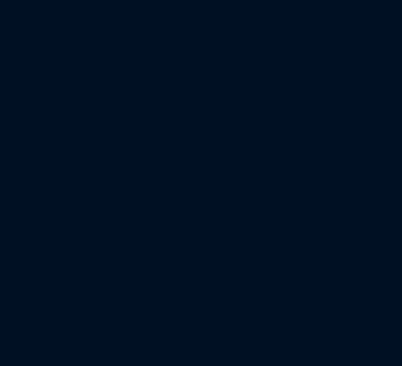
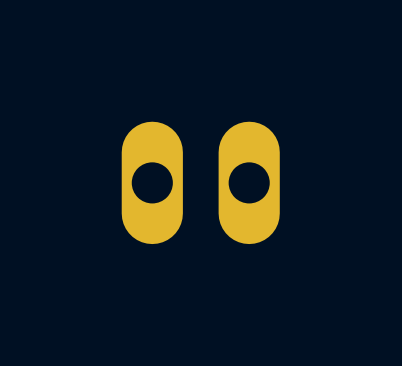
part: none -> (200, 182)

